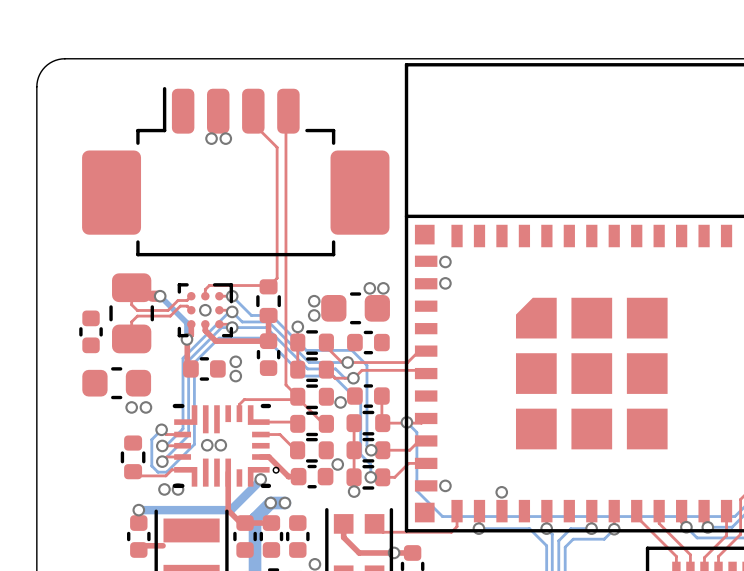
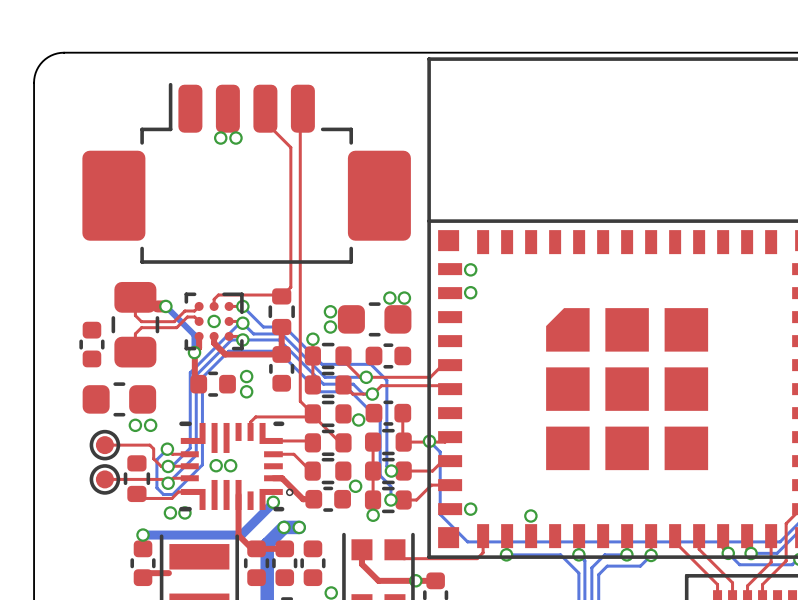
top track: none -> (104, 445) (149, 445) (153, 448) (153, 458) (161, 466) (168, 466)
part: none -> (104, 445)
top track: none -> (104, 479) (164, 479) (168, 483)
part: none -> (104, 479)

